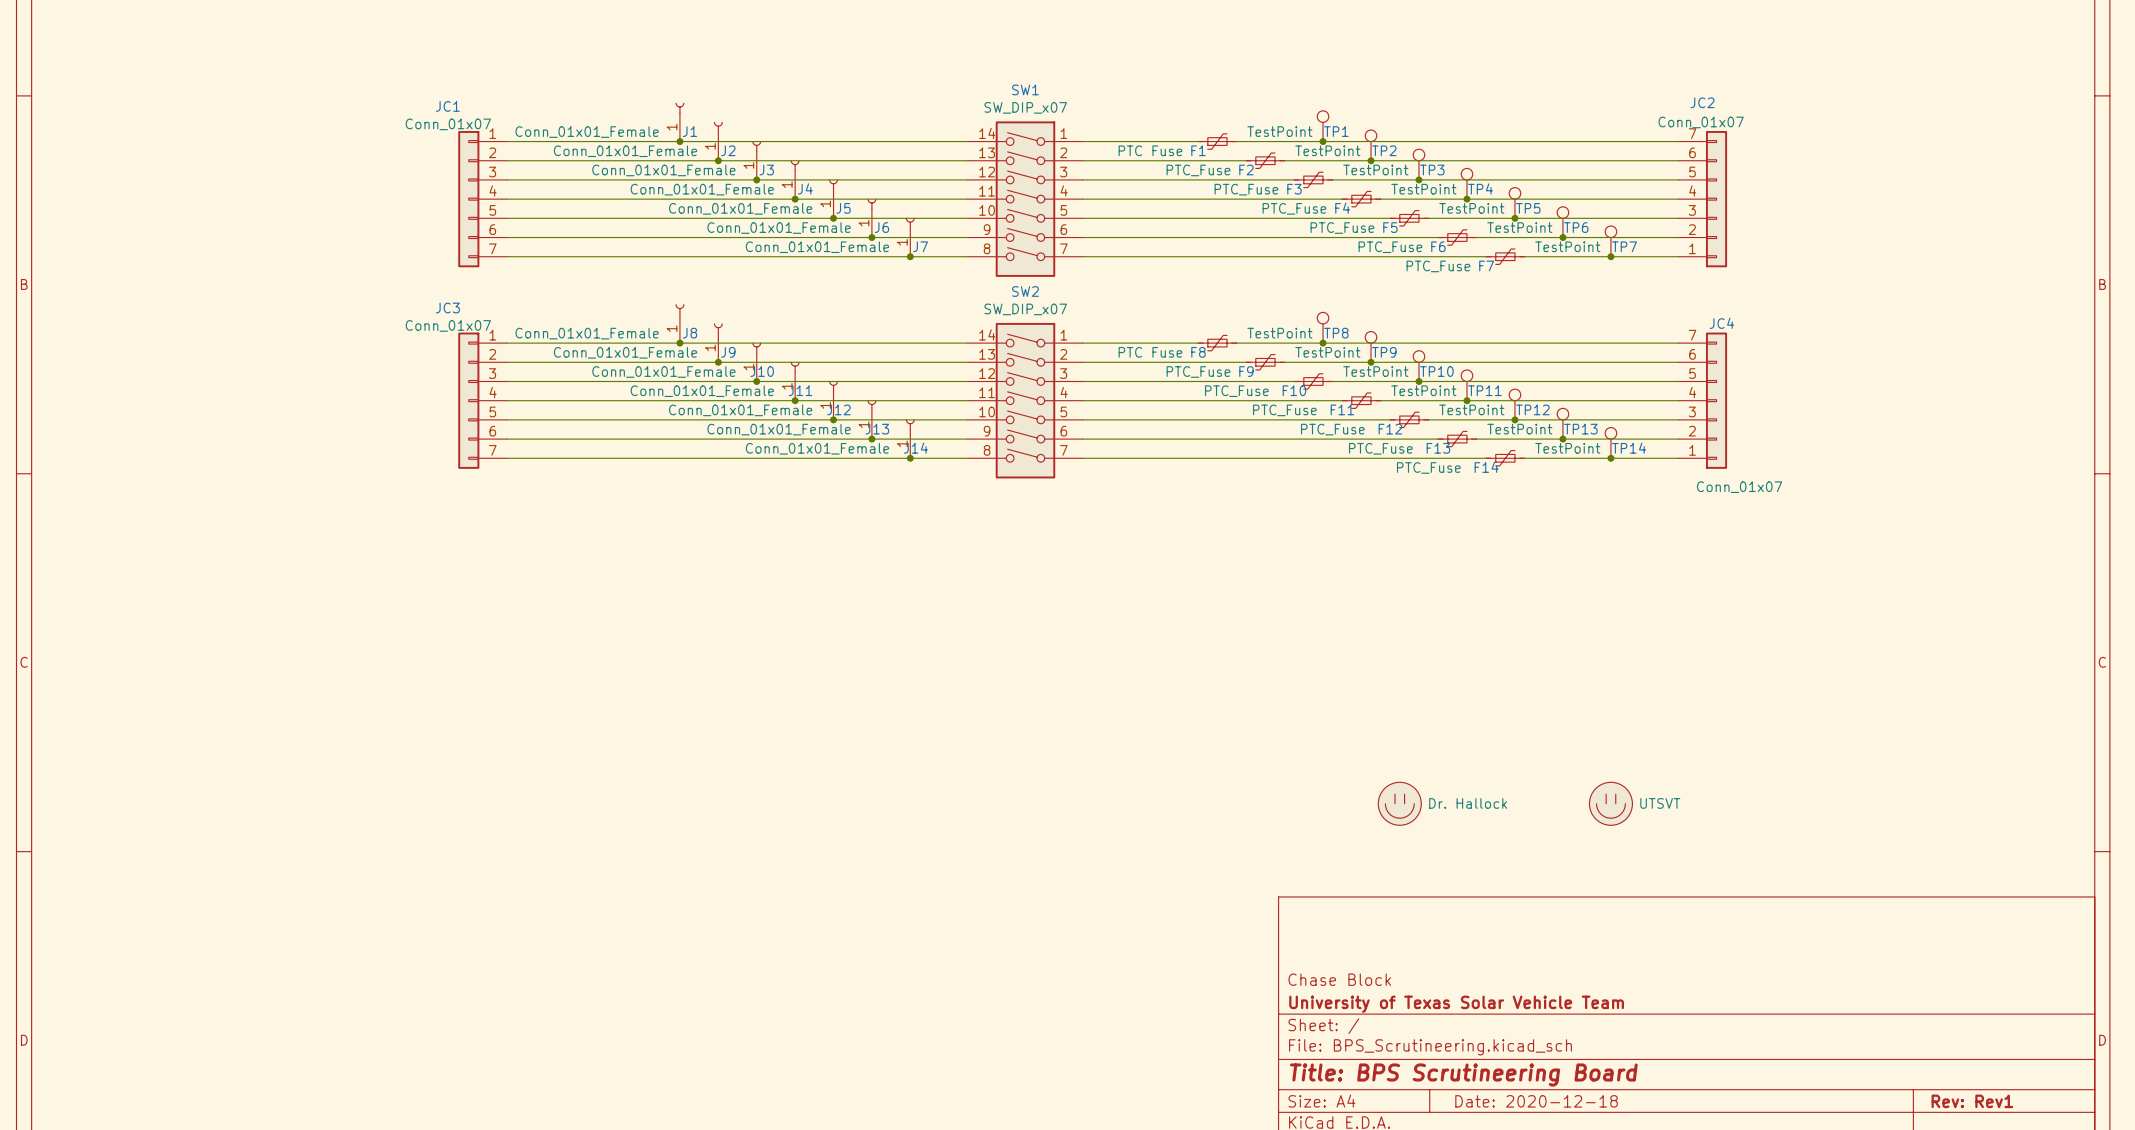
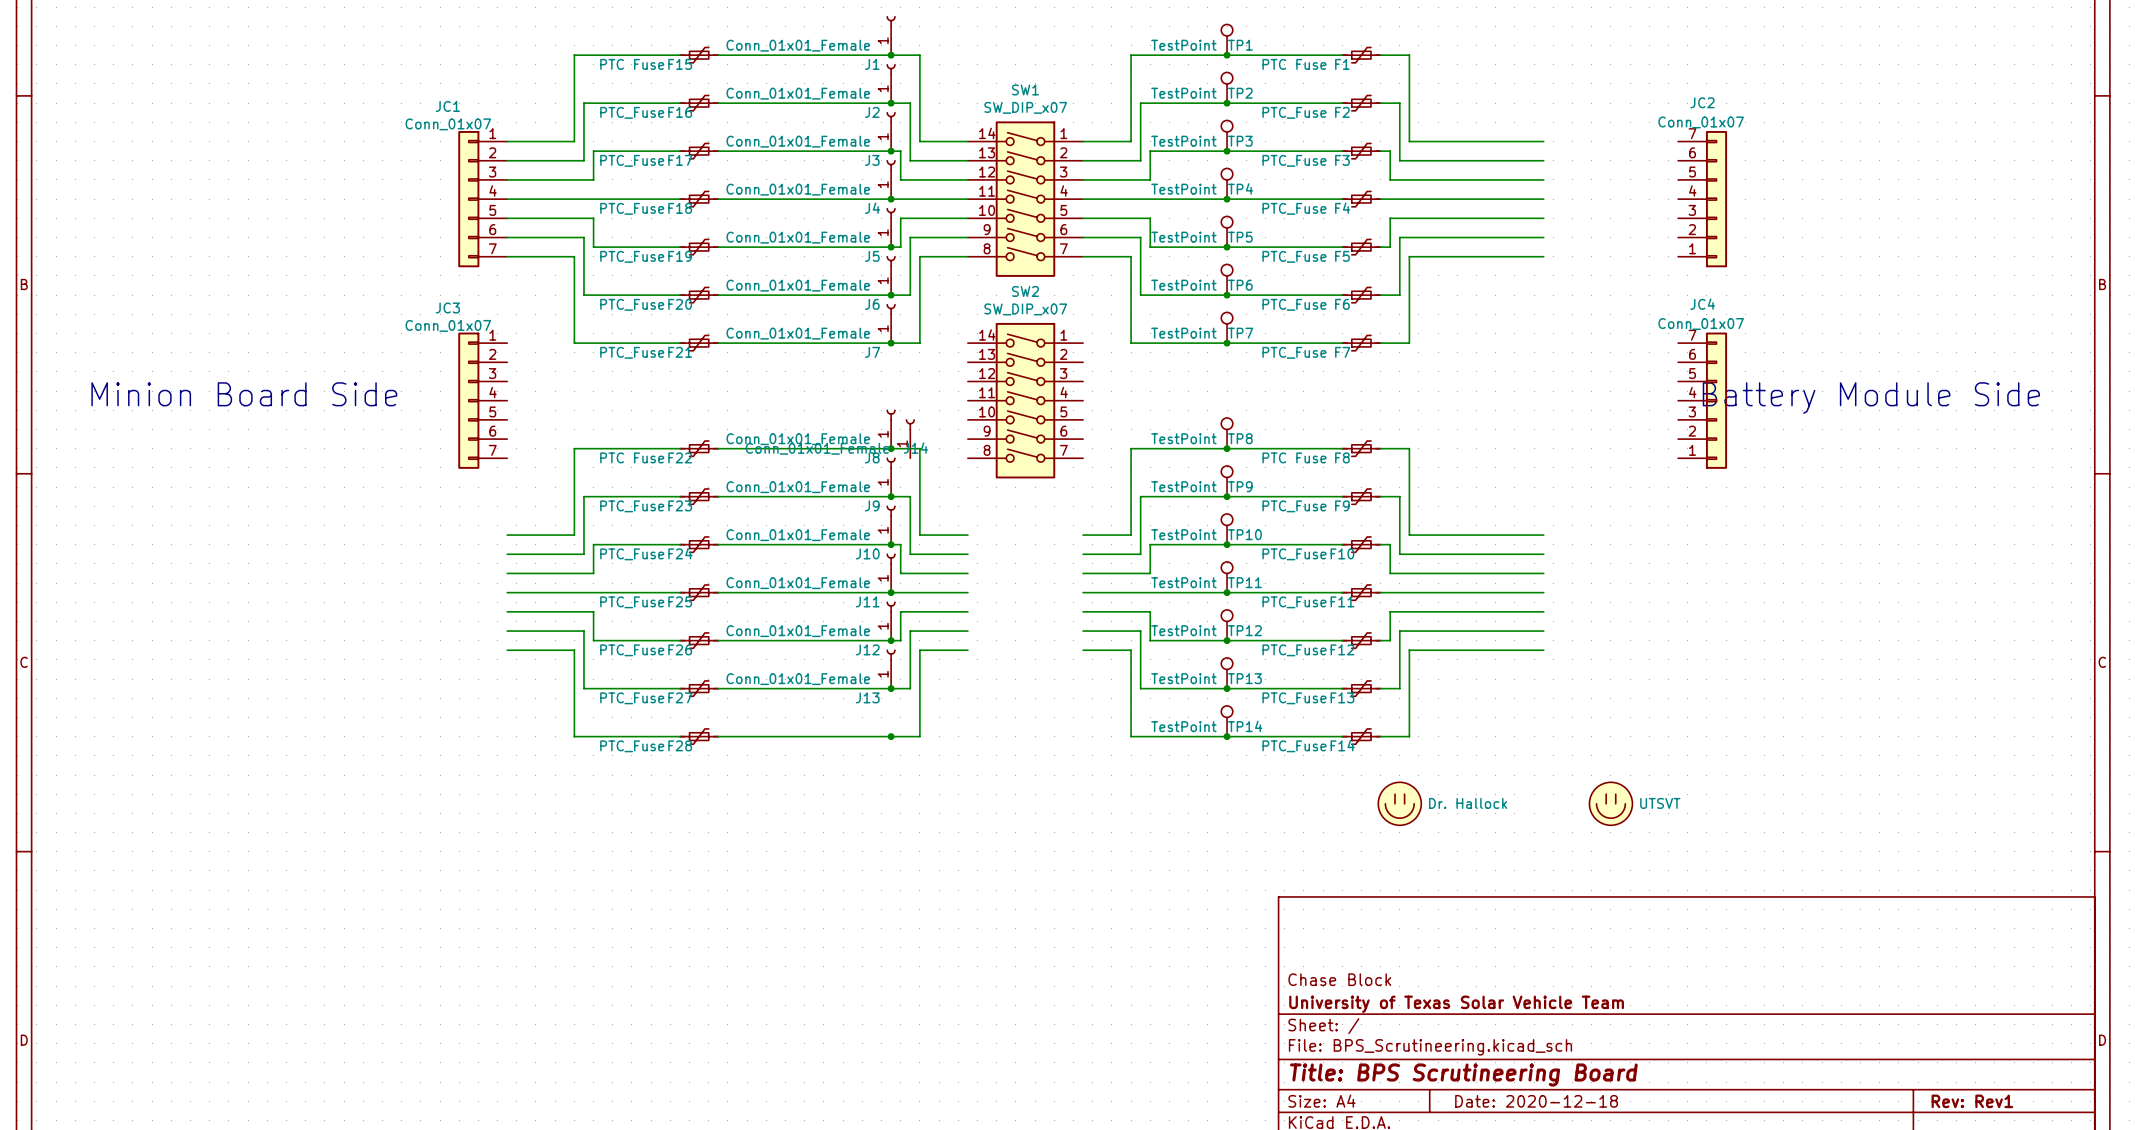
wire: none -> (679, 55) (574, 55) (574, 141)
F15: none -> PTC Fuse (699, 55)
junction: none -> (891, 55)
junction: none -> (1227, 55)
wire: none -> (679, 103) (583, 103) (583, 160)
F16: none -> PTC_Fuse (699, 103)
junction: none -> (891, 103)
junction: none -> (1227, 103)
J1 position: (679, 122) -> (891, 35)
TP1 position: (1323, 126) -> (1227, 39)
J1 name position: J1 (689, 131) -> J1 (872, 64)
wire: (574, 141) (919, 141) -> (718, 55) (919, 55) (919, 141)
junction: (679, 141) -> none
J2 position: (718, 141) -> (891, 83)
wire: (1131, 141) (1198, 141) -> (1131, 141) (1131, 55) (1342, 55)
F1 position: (1217, 141) -> (1361, 55)
wire: (1236, 141) (1409, 141) -> (1380, 55) (1409, 55) (1409, 141)
junction: (1323, 141) -> none
wire: (1543, 141) (1678, 141) -> none
TP2 position: (1371, 145) -> (1227, 87)
J2 name position: J2 (728, 150) -> J2 (872, 112)
wire: none -> (679, 151) (593, 151) (593, 179)
F17: none -> PTC_Fuse (699, 151)
junction: none -> (891, 151)
junction: none -> (1227, 151)
wire: (583, 160) (910, 160) -> (718, 103) (910, 103) (910, 160)
junction: (718, 160) -> none
J3 position: (756, 160) -> (891, 131)
wire: (1140, 160) (1246, 160) -> (1140, 160) (1140, 103) (1342, 103)
F2 position: (1265, 160) -> (1361, 103)
wire: (1284, 160) (1399, 160) -> (1380, 103) (1399, 103) (1399, 160)
junction: (1371, 160) -> none
wire: (1543, 160) (1678, 160) -> none
TP3 position: (1418, 164) -> (1227, 135)
J3 name position: J3 (766, 169) -> J3 (872, 160)
wire: (593, 179) (900, 179) -> (718, 151) (900, 151) (900, 179)
junction: (756, 179) -> none
J4 position: (795, 179) -> (891, 179)
wire: (1150, 179) (1294, 179) -> (1150, 179) (1150, 151) (1342, 151)
F3 position: (1313, 179) -> (1361, 151)
wire: (1332, 179) (1390, 179) -> (1380, 151) (1390, 151) (1390, 179)
junction: (1418, 179) -> none
wire: (1543, 179) (1678, 179) -> none
TP4 position: (1466, 183) -> (1227, 183)
J4 name position: J4 (805, 188) -> J4 (872, 208)
J5 position: (833, 198) -> (891, 227)
F18: none -> PTC_Fuse (699, 199)
junction: (795, 199) -> none
junction: none -> (891, 199)
junction: none -> (1227, 199)
junction: (1466, 199) -> none
wire: (1543, 199) (1678, 199) -> none
TP5 position: (1514, 202) -> (1227, 231)
J5 name position: J5 (843, 208) -> J5 (872, 256)
wire: (593, 218) (900, 218) -> (718, 247) (900, 247) (900, 218)
wire: none -> (593, 218) (593, 247) (679, 247)
junction: (833, 218) -> none
J6 position: (871, 218) -> (891, 275)
wire: (1150, 218) (1390, 218) -> (1150, 218) (1150, 247) (1342, 247)
F5 position: (1409, 218) -> (1361, 247)
wire: none -> (1428, 218) (1390, 218) (1390, 247) (1380, 247)
junction: (1514, 218) -> none
wire: (1543, 218) (1678, 218) -> none
TP6 position: (1562, 222) -> (1227, 279)
J6 name position: J6 (881, 227) -> J6 (872, 304)
wire: (583, 237) (910, 237) -> (718, 295) (910, 295) (910, 237)
wire: none -> (583, 237) (583, 295) (679, 295)
junction: (871, 237) -> none
J7 position: (910, 237) -> (891, 323)
wire: (1140, 237) (1399, 237) -> (1140, 237) (1140, 295) (1342, 295)
wire: none -> (1399, 237) (1399, 295) (1380, 295)
F6 position: (1457, 237) -> (1361, 295)
wire: (1543, 237) (1678, 237) -> none
junction: (1562, 237) -> none
TP7 position: (1610, 241) -> (1227, 327)
J7 name position: J7 (920, 246) -> J7 (872, 352)
F19: none -> PTC_Fuse (699, 247)
junction: none -> (891, 247)
junction: none -> (1227, 247)
wire: (574, 256) (919, 256) -> none
junction: (910, 256) -> none
wire: (1131, 256) (1409, 256) -> none
F7 position: (1505, 256) -> (1361, 343)
wire: (1543, 256) (1678, 256) -> none
junction: (1610, 256) -> none
F20: none -> PTC_Fuse (699, 295)
junction: none -> (891, 295)
junction: none -> (1227, 295)
J8 position: (679, 323) -> (891, 429)
JC4 name position: JC4 (1721, 323) -> JC4 (1702, 304)
TP8 position: (1323, 327) -> (1227, 433)
J8 name position: J8 (689, 333) -> J8 (872, 457)
J9 position: (718, 342) -> (891, 477)
wire: (507, 343) (574, 343) -> (574, 256) (574, 343)
junction: (679, 343) -> none
F21: none -> PTC_Fuse (699, 343)
junction: none -> (891, 343)
wire: (919, 343) (967, 343) -> (919, 343) (919, 256)
wire: (1083, 343) (1131, 343) -> (1131, 256) (1131, 343)
F8 position: (1217, 343) -> (1361, 448)
junction: none -> (1227, 343)
junction: (1323, 343) -> none
wire: (1409, 343) (1678, 343) -> (1409, 343) (1409, 256)
TP9 position: (1371, 346) -> (1227, 481)
J9 name position: J9 (728, 352) -> J9 (872, 505)
wire: (507, 362) (967, 362) -> none
junction: (718, 362) -> none
J10 position: (756, 362) -> (891, 525)
wire: (1083, 362) (1246, 362) -> none
F9 position: (1265, 362) -> (1361, 496)
wire: (1284, 362) (1678, 362) -> none
junction: (1371, 362) -> none
TP10 position: (1418, 366) -> (1227, 529)
J10 name position: J10 (762, 371) -> J10 (867, 553)
wire: (507, 381) (967, 381) -> none
junction: (756, 381) -> none
J11 position: (795, 381) -> (891, 573)
wire: (1083, 381) (1294, 381) -> none
F10 position: (1313, 381) -> (1361, 544)
wire: (1332, 381) (1678, 381) -> none
junction: (1418, 381) -> none
TP11 position: (1466, 385) -> (1227, 577)
J11 name position: J11 (800, 390) -> J11 (867, 601)
F10 value position: PTC_Fuse (1236, 391) -> PTC_Fuse (1294, 554)
text: none -> Minion Board Side (244, 394)
text: none -> Battery Module Side (1871, 398)
wire: (507, 400) (967, 400) -> none
junction: (795, 400) -> none
J12 position: (833, 400) -> (891, 621)
wire: (1083, 400) (1342, 400) -> none
F11 position: (1361, 400) -> (1361, 592)
wire: (1380, 400) (1678, 400) -> none
junction: (1466, 400) -> none
TP12 position: (1514, 404) -> (1227, 625)
J12 name position: J12 (838, 409) -> J12 (867, 649)
F11 value position: PTC_Fuse (1284, 410) -> PTC_Fuse (1294, 602)
wire: (507, 419) (967, 419) -> none
junction: (833, 419) -> none
J13 position: (871, 419) -> (891, 669)
wire: (1083, 419) (1390, 419) -> none
F12 position: (1409, 419) -> (1361, 640)
wire: (1428, 419) (1678, 419) -> none
junction: (1514, 419) -> none
TP13 position: (1562, 423) -> (1227, 673)
J13 name position: J13 (877, 429) -> J13 (867, 697)
F12 value position: PTC_Fuse (1332, 429) -> PTC_Fuse (1294, 650)
wire: (507, 439) (967, 439) -> none
junction: (871, 439) -> none
wire: (1083, 439) (1438, 439) -> none
F13 position: (1457, 439) -> (1361, 688)
wire: (1476, 439) (1678, 439) -> none
junction: (1562, 439) -> none
TP14 position: (1610, 442) -> (1227, 721)
wire: none -> (679, 448) (574, 448) (574, 535) (507, 535)
F22: none -> PTC Fuse (699, 448)
wire: none -> (718, 448) (919, 448) (919, 535) (967, 535)
junction: none -> (891, 448)
junction: none -> (1227, 448)
wire: none -> (1342, 448) (1131, 448) (1131, 535) (1083, 535)
wire: none -> (1380, 448) (1409, 448) (1409, 535) (1543, 535)
F13 value position: PTC_Fuse (1380, 448) -> PTC_Fuse (1294, 698)
wire: (507, 458) (967, 458) -> none
junction: (910, 458) -> none
wire: (1083, 458) (1486, 458) -> none
F14 position: (1505, 458) -> (1361, 736)
wire: (1524, 458) (1678, 458) -> none
junction: (1610, 458) -> none
F14 value position: PTC_Fuse (1428, 467) -> PTC_Fuse (1294, 746)
JC4 value position: Conn_01x07 (1739, 487) -> Conn_01x07 (1701, 324)
wire: none -> (679, 496) (583, 496) (583, 554) (507, 554)
F23: none -> PTC_Fuse (699, 496)
wire: none -> (718, 496) (910, 496) (910, 554) (967, 554)
junction: none -> (891, 496)
junction: none -> (1227, 496)
wire: none -> (1342, 496) (1140, 496) (1140, 554) (1083, 554)
wire: none -> (1380, 496) (1399, 496) (1399, 554) (1543, 554)
wire: none -> (679, 544) (593, 544) (593, 573) (507, 573)
F24: none -> PTC_Fuse (699, 544)
wire: none -> (718, 544) (900, 544) (900, 573) (967, 573)
junction: none -> (891, 544)
junction: none -> (1227, 544)
wire: none -> (1342, 544) (1150, 544) (1150, 573) (1083, 573)
wire: none -> (1380, 544) (1390, 544) (1390, 573) (1543, 573)
wire: none -> (507, 592) (679, 592)
F25: none -> PTC_Fuse (699, 592)
wire: none -> (718, 592) (967, 592)
junction: none -> (891, 592)
wire: none -> (1083, 592) (1342, 592)
junction: none -> (1227, 592)
wire: none -> (1380, 592) (1543, 592)
wire: none -> (507, 611) (593, 611) (593, 640) (679, 640)
wire: none -> (967, 611) (900, 611) (900, 640) (718, 640)
wire: none -> (1083, 611) (1150, 611) (1150, 640) (1342, 640)
wire: none -> (1543, 611) (1390, 611) (1390, 640) (1380, 640)
wire: none -> (507, 631) (583, 631) (583, 688) (679, 688)
wire: none -> (967, 631) (910, 631) (910, 688) (718, 688)
wire: none -> (1083, 631) (1140, 631) (1140, 688) (1342, 688)
wire: none -> (1543, 631) (1399, 631) (1399, 688) (1380, 688)
F26: none -> PTC_Fuse (699, 640)
junction: none -> (891, 640)
junction: none -> (1227, 640)
wire: none -> (507, 650) (574, 650) (574, 736) (679, 736)
wire: none -> (967, 650) (919, 650) (919, 736) (718, 736)
wire: none -> (1083, 650) (1131, 650) (1131, 736) (1342, 736)
wire: none -> (1543, 650) (1409, 650) (1409, 736) (1380, 736)
F27: none -> PTC_Fuse (699, 688)
junction: none -> (891, 688)
junction: none -> (1227, 688)
F28: none -> PTC_Fuse (699, 736)
junction: none -> (891, 736)
junction: none -> (1227, 736)

